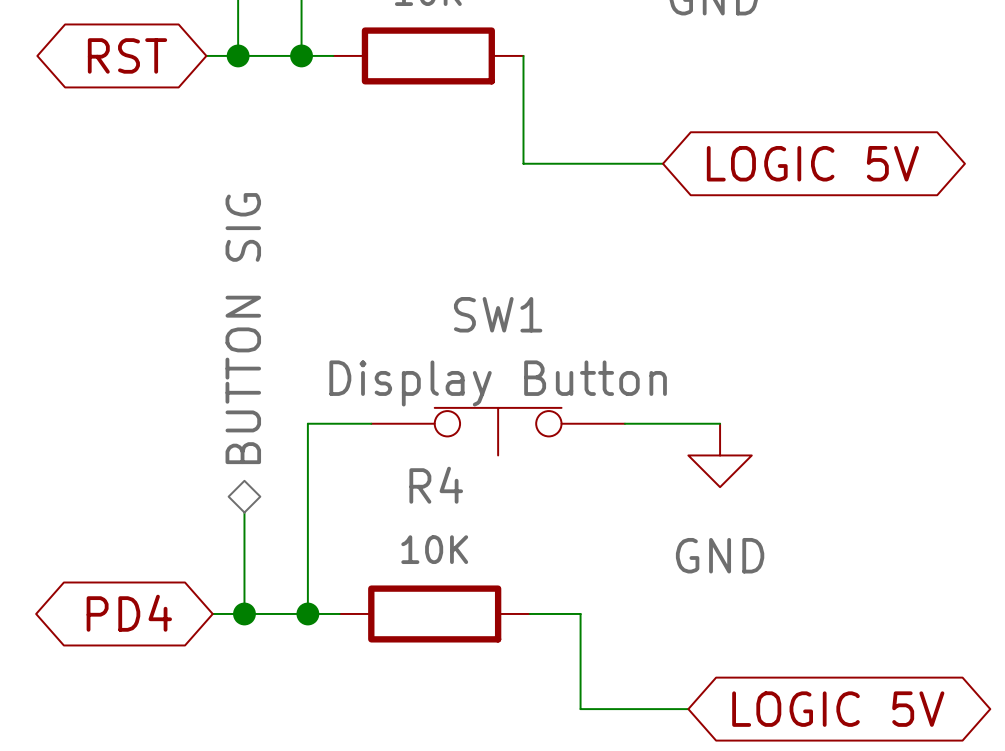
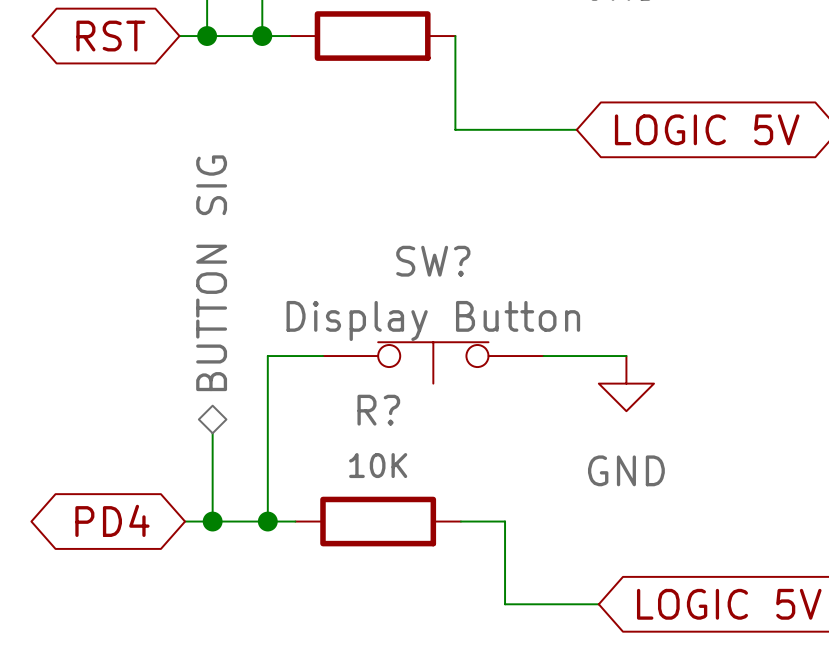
SW1 name: SW1 (498, 314) -> SW? (433, 261)
R4 name: R4 (436, 485) -> R? (378, 410)

